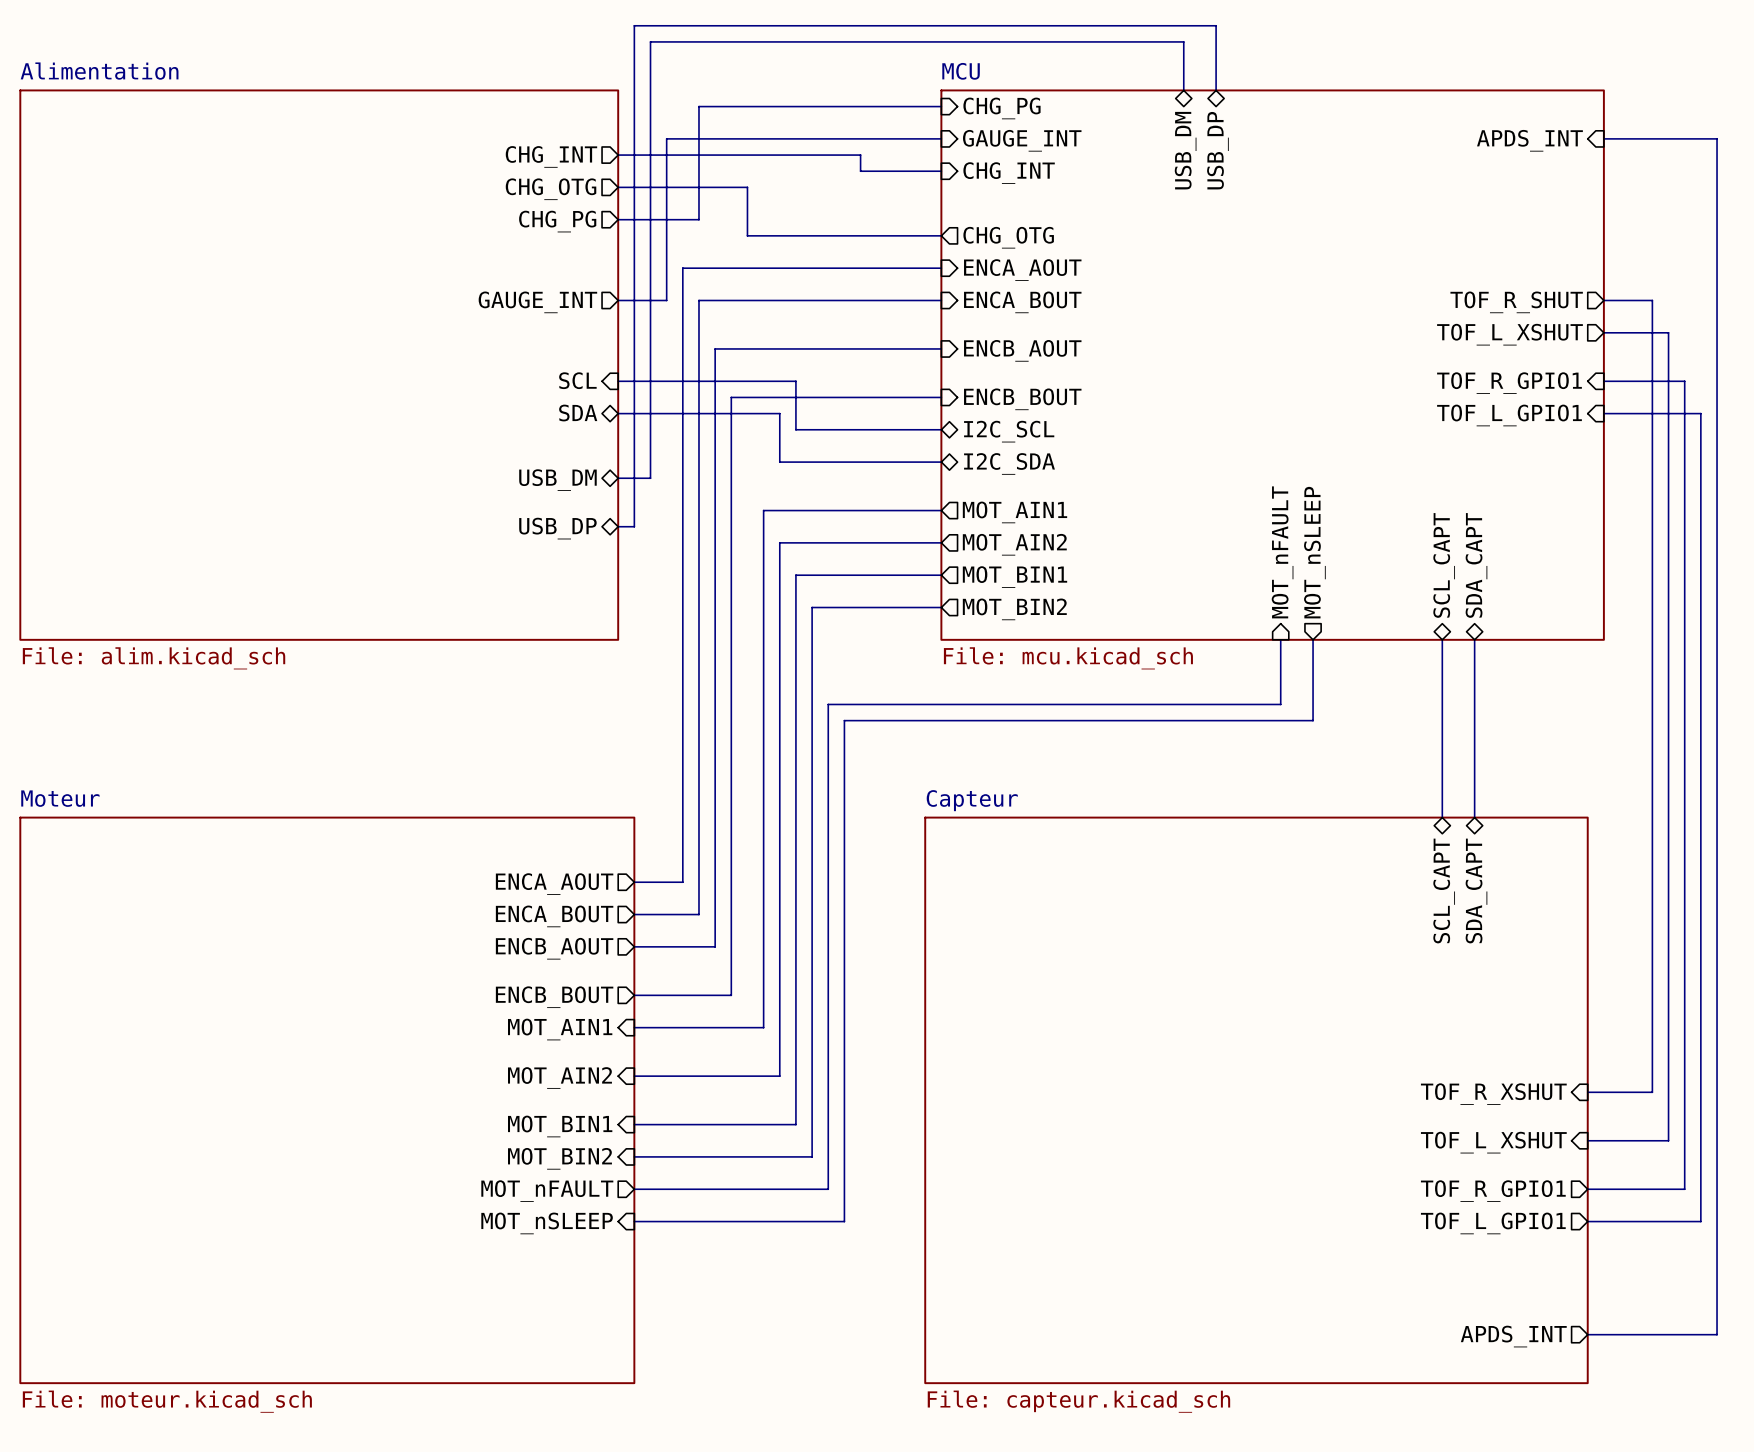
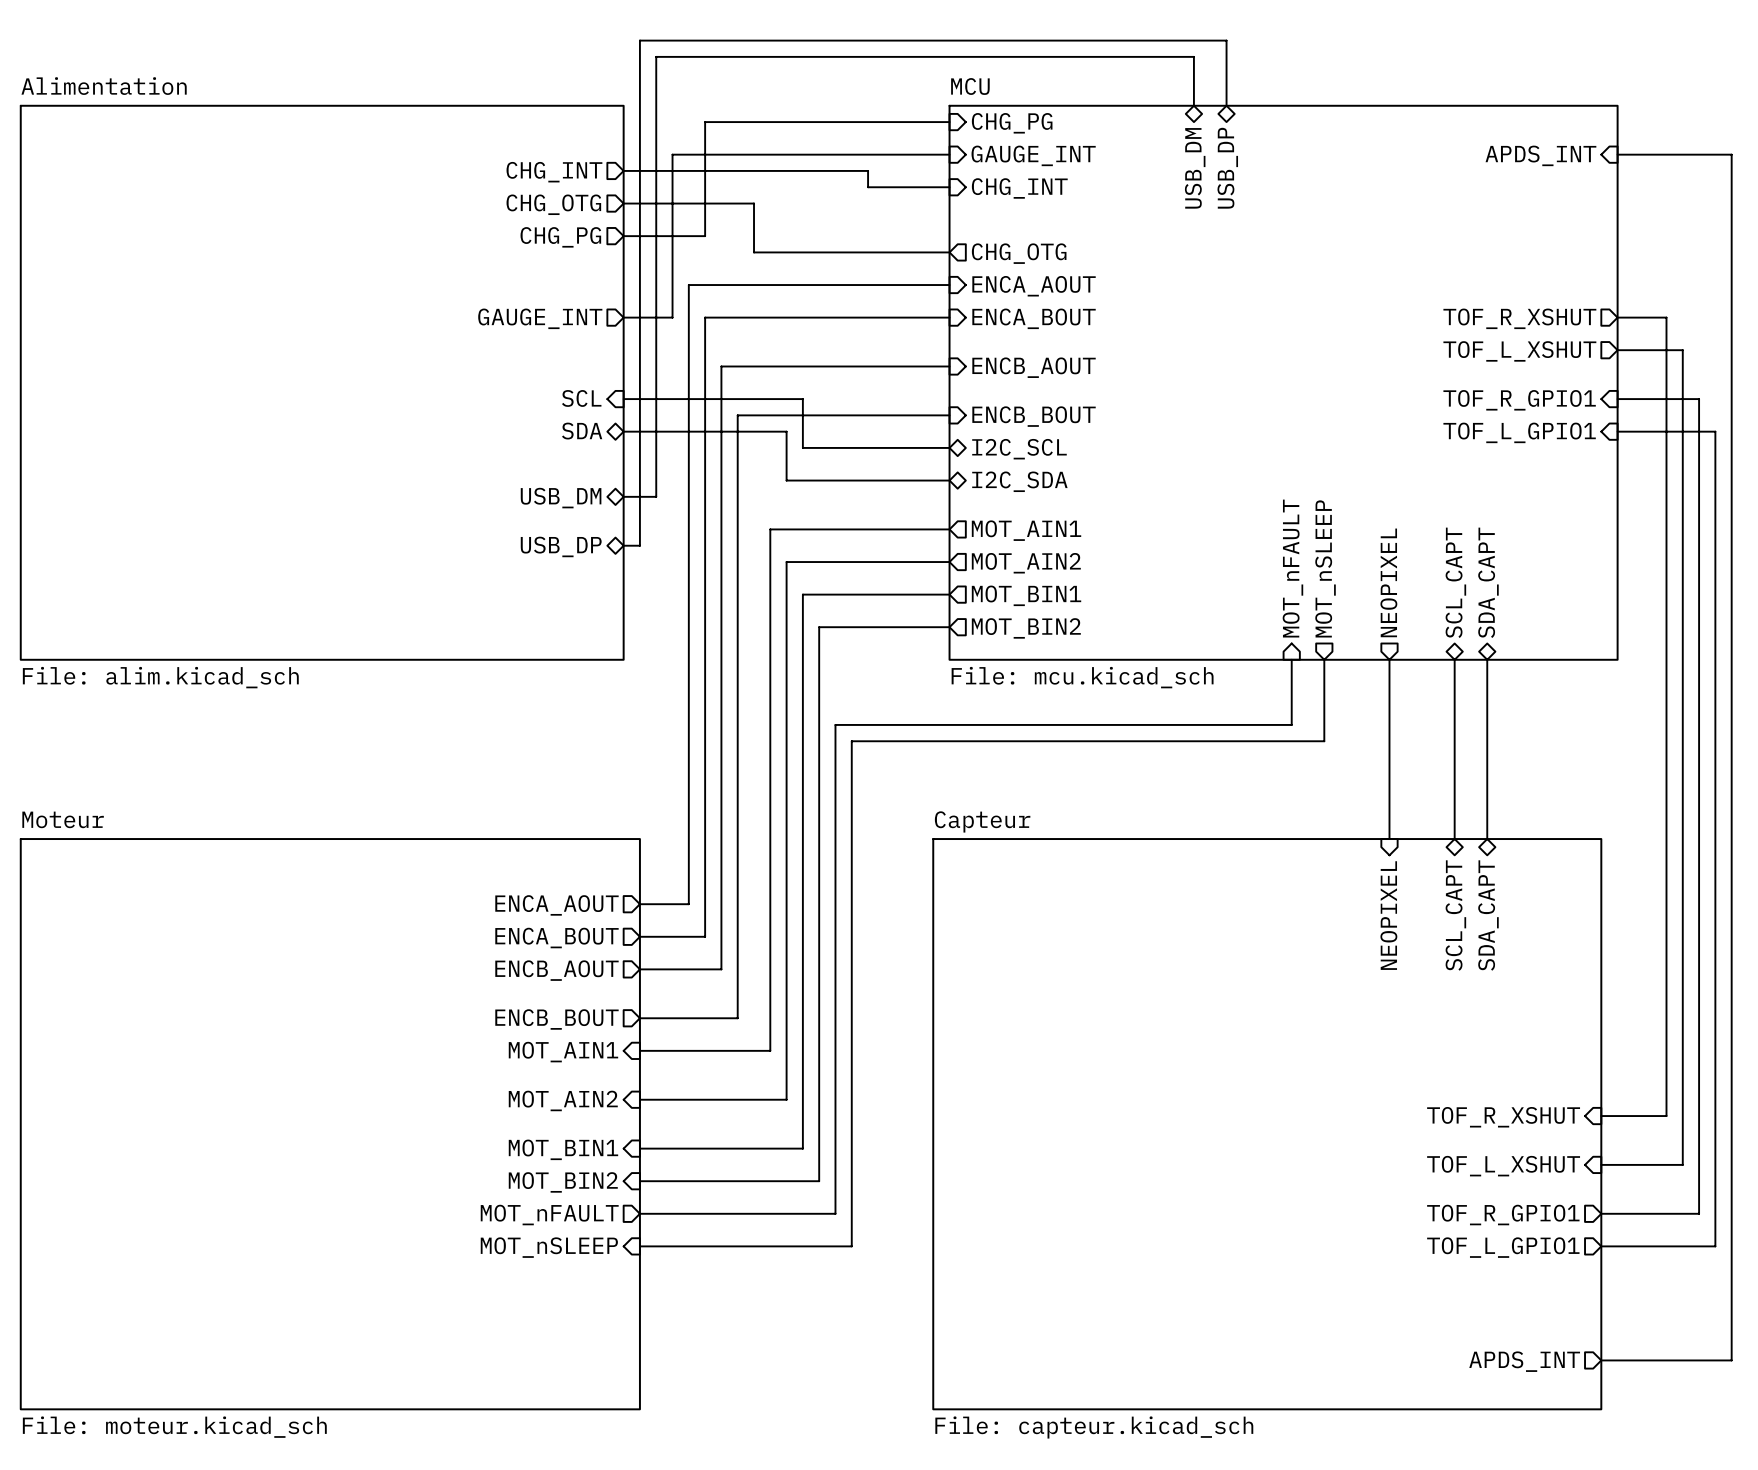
sheet pin: TOF_R_SHUT (1516, 302) -> TOF_R_XSHUT (1519, 318)
sheet pin: none -> NEOPIXEL (1388, 582)
wire: none -> (1389, 659) (1389, 839)
sheet pin: none -> NEOPIXEL (1388, 915)

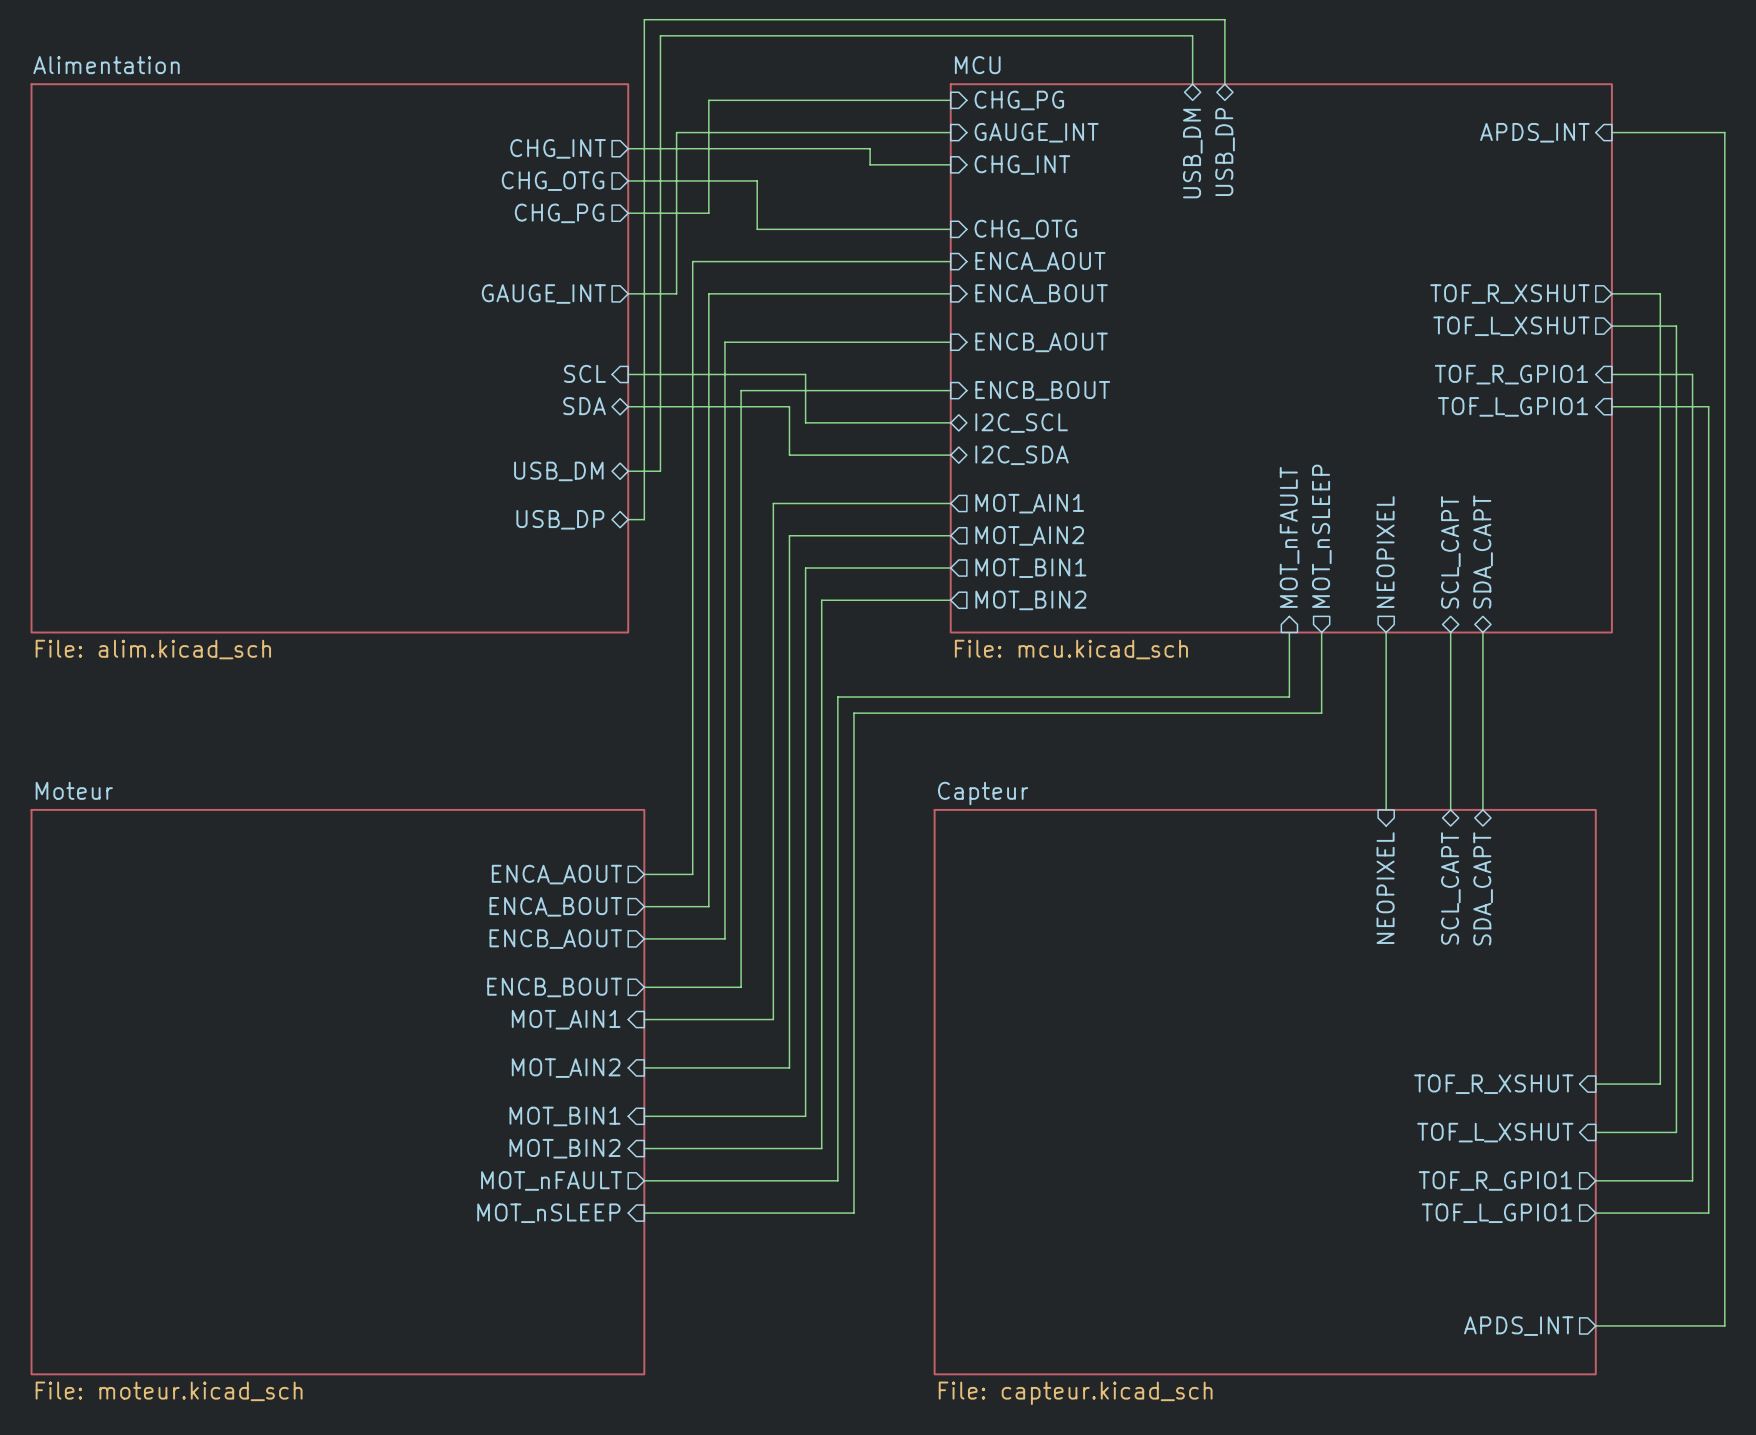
sheet pin shape: output (1019, 253) -> input (1025, 229)

